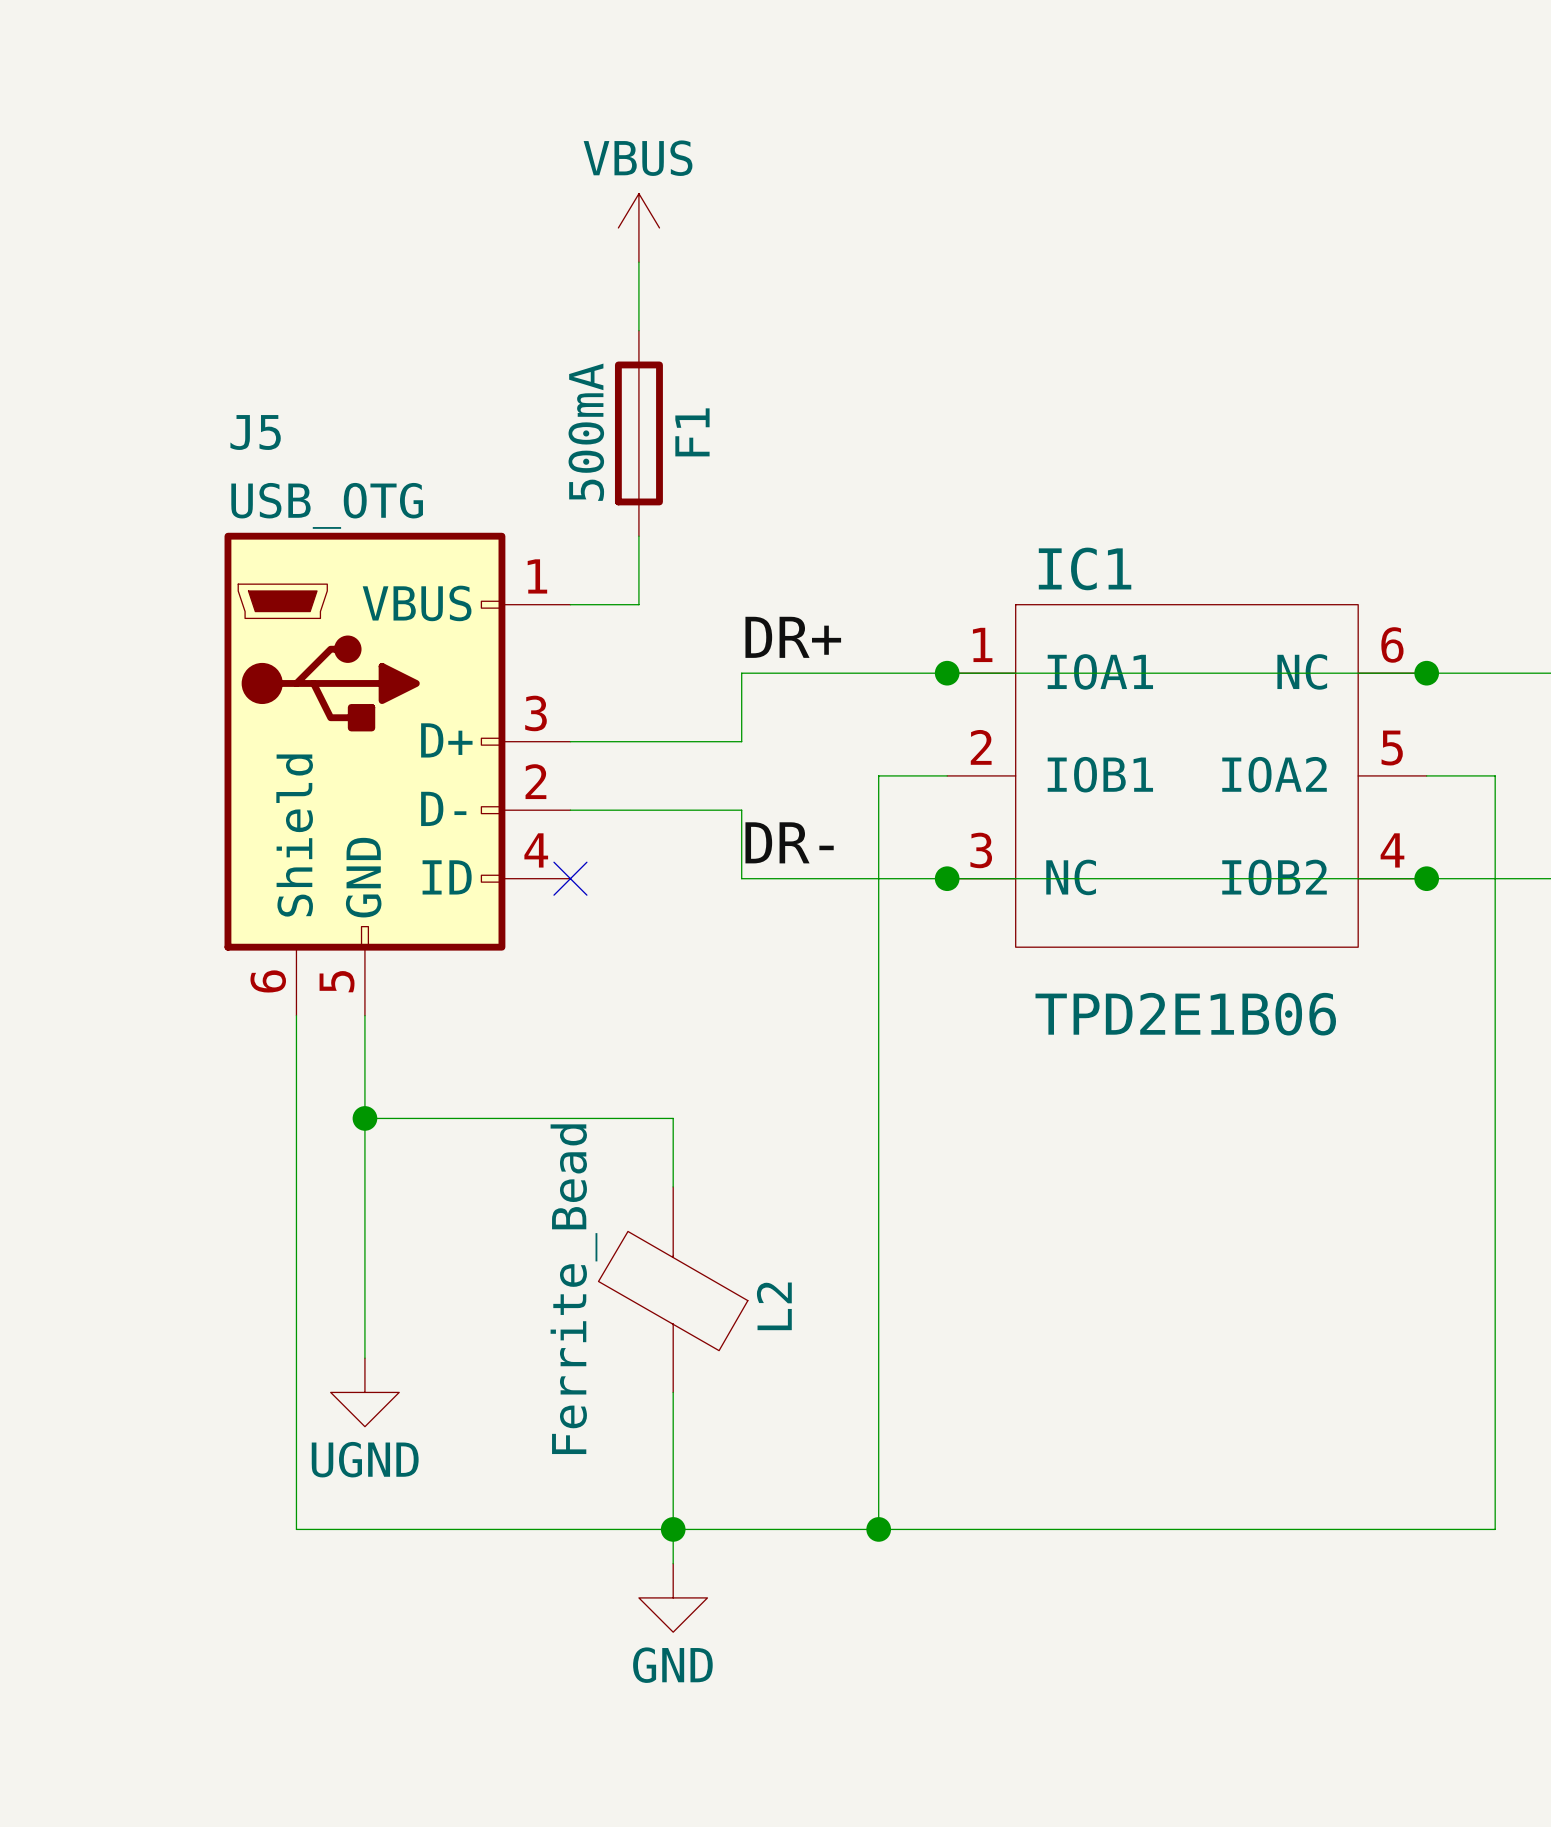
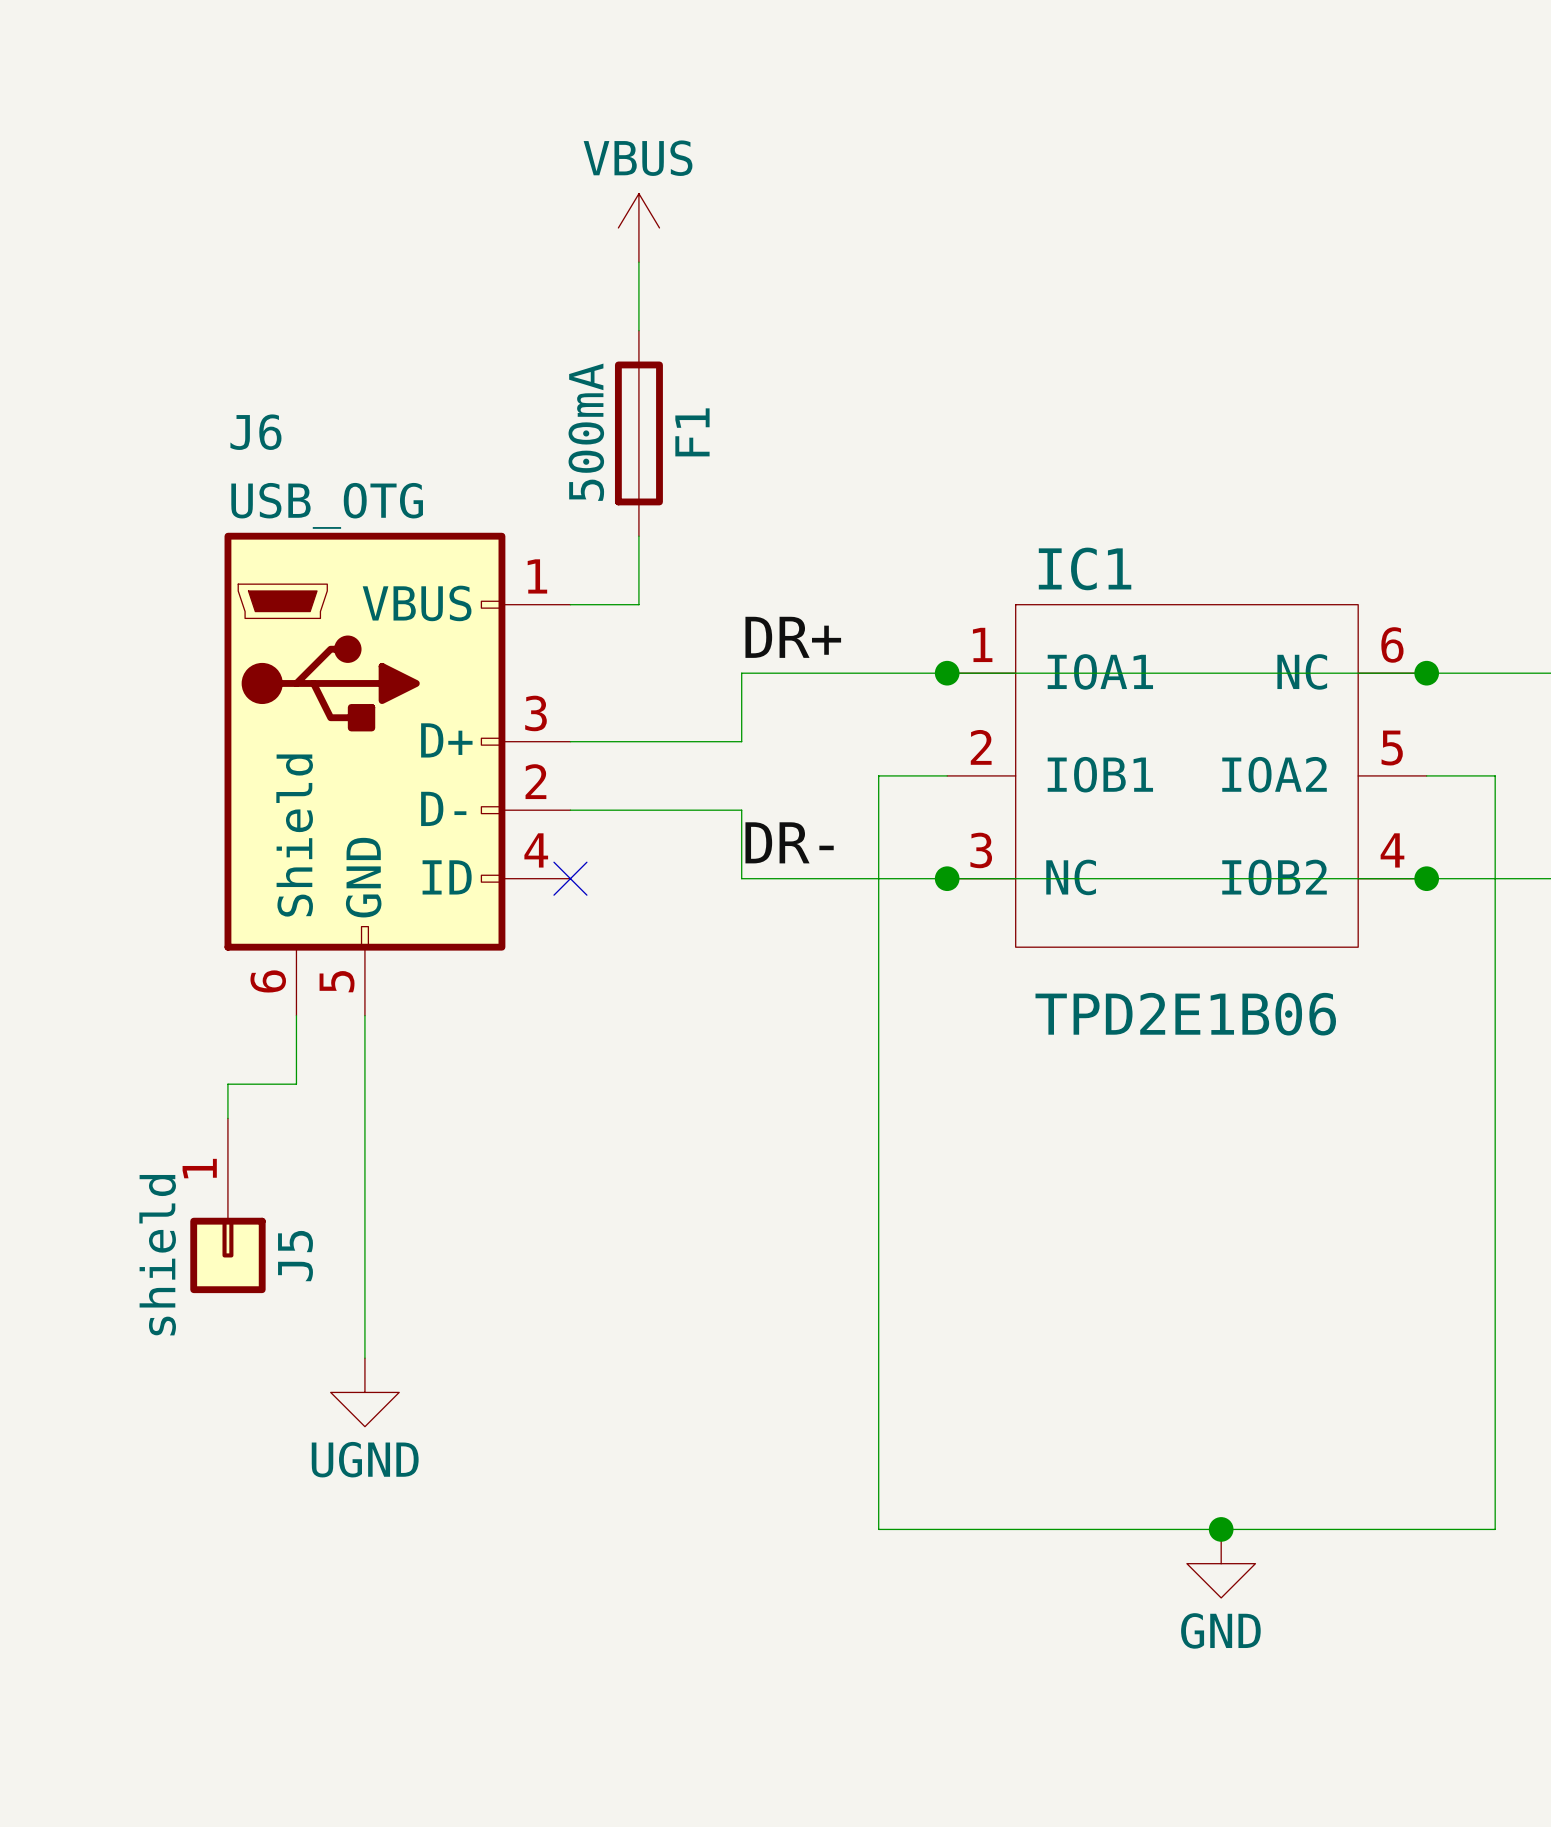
J5 name: J5 (255, 432) -> J6 (255, 432)
wire: (296, 1084) (296, 1529) (878, 1529) -> (296, 1084) (227, 1084) (227, 1118)
wire: (364, 1118) (673, 1118) (673, 1186) -> none
junction: (364, 1118) -> none
J5: none -> shield (227, 1205)
L2: Ferrite_Bead (673, 1289) -> none
wire: (673, 1392) (673, 1563) -> none
junction: (673, 1529) -> none
junction: (878, 1529) -> none
junction: none -> (1221, 1529)
power symbol position: GND (673, 1597) -> GND (1221, 1563)

